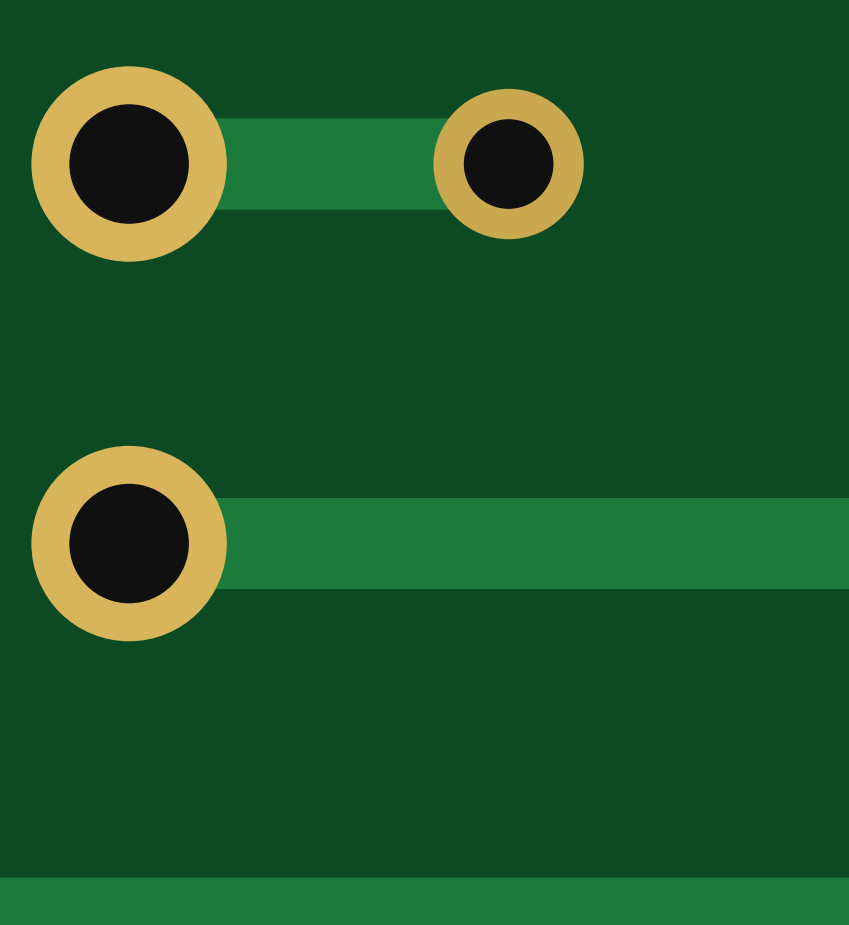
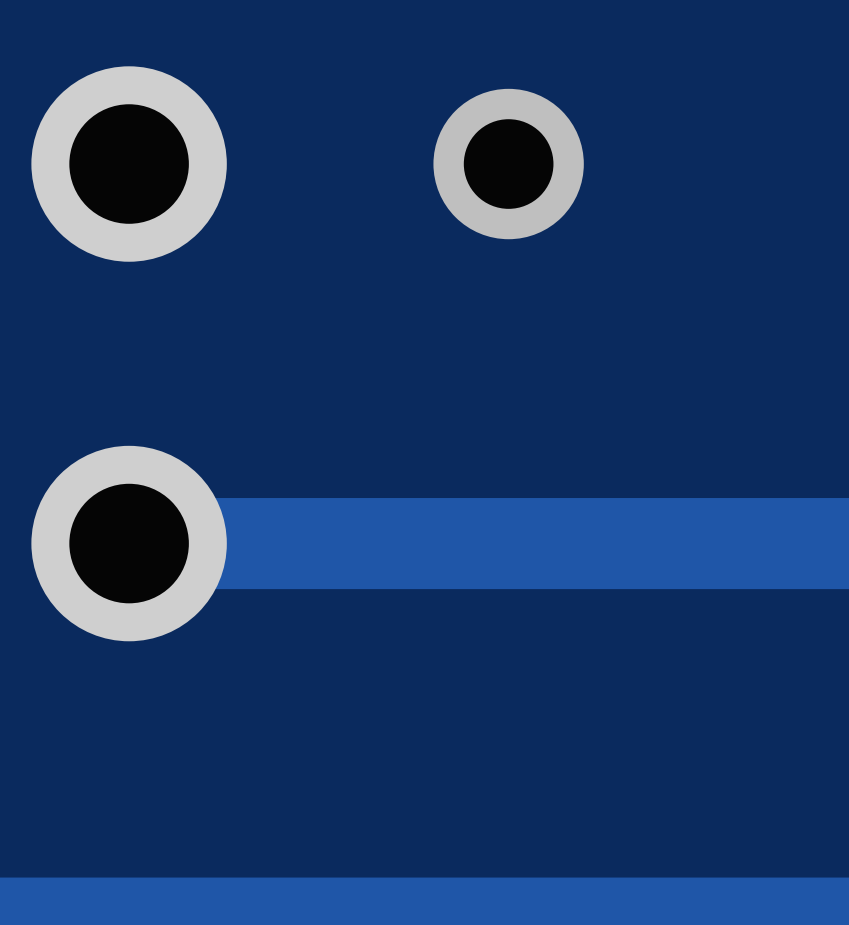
track: (508, 164) (129, 164) -> none

